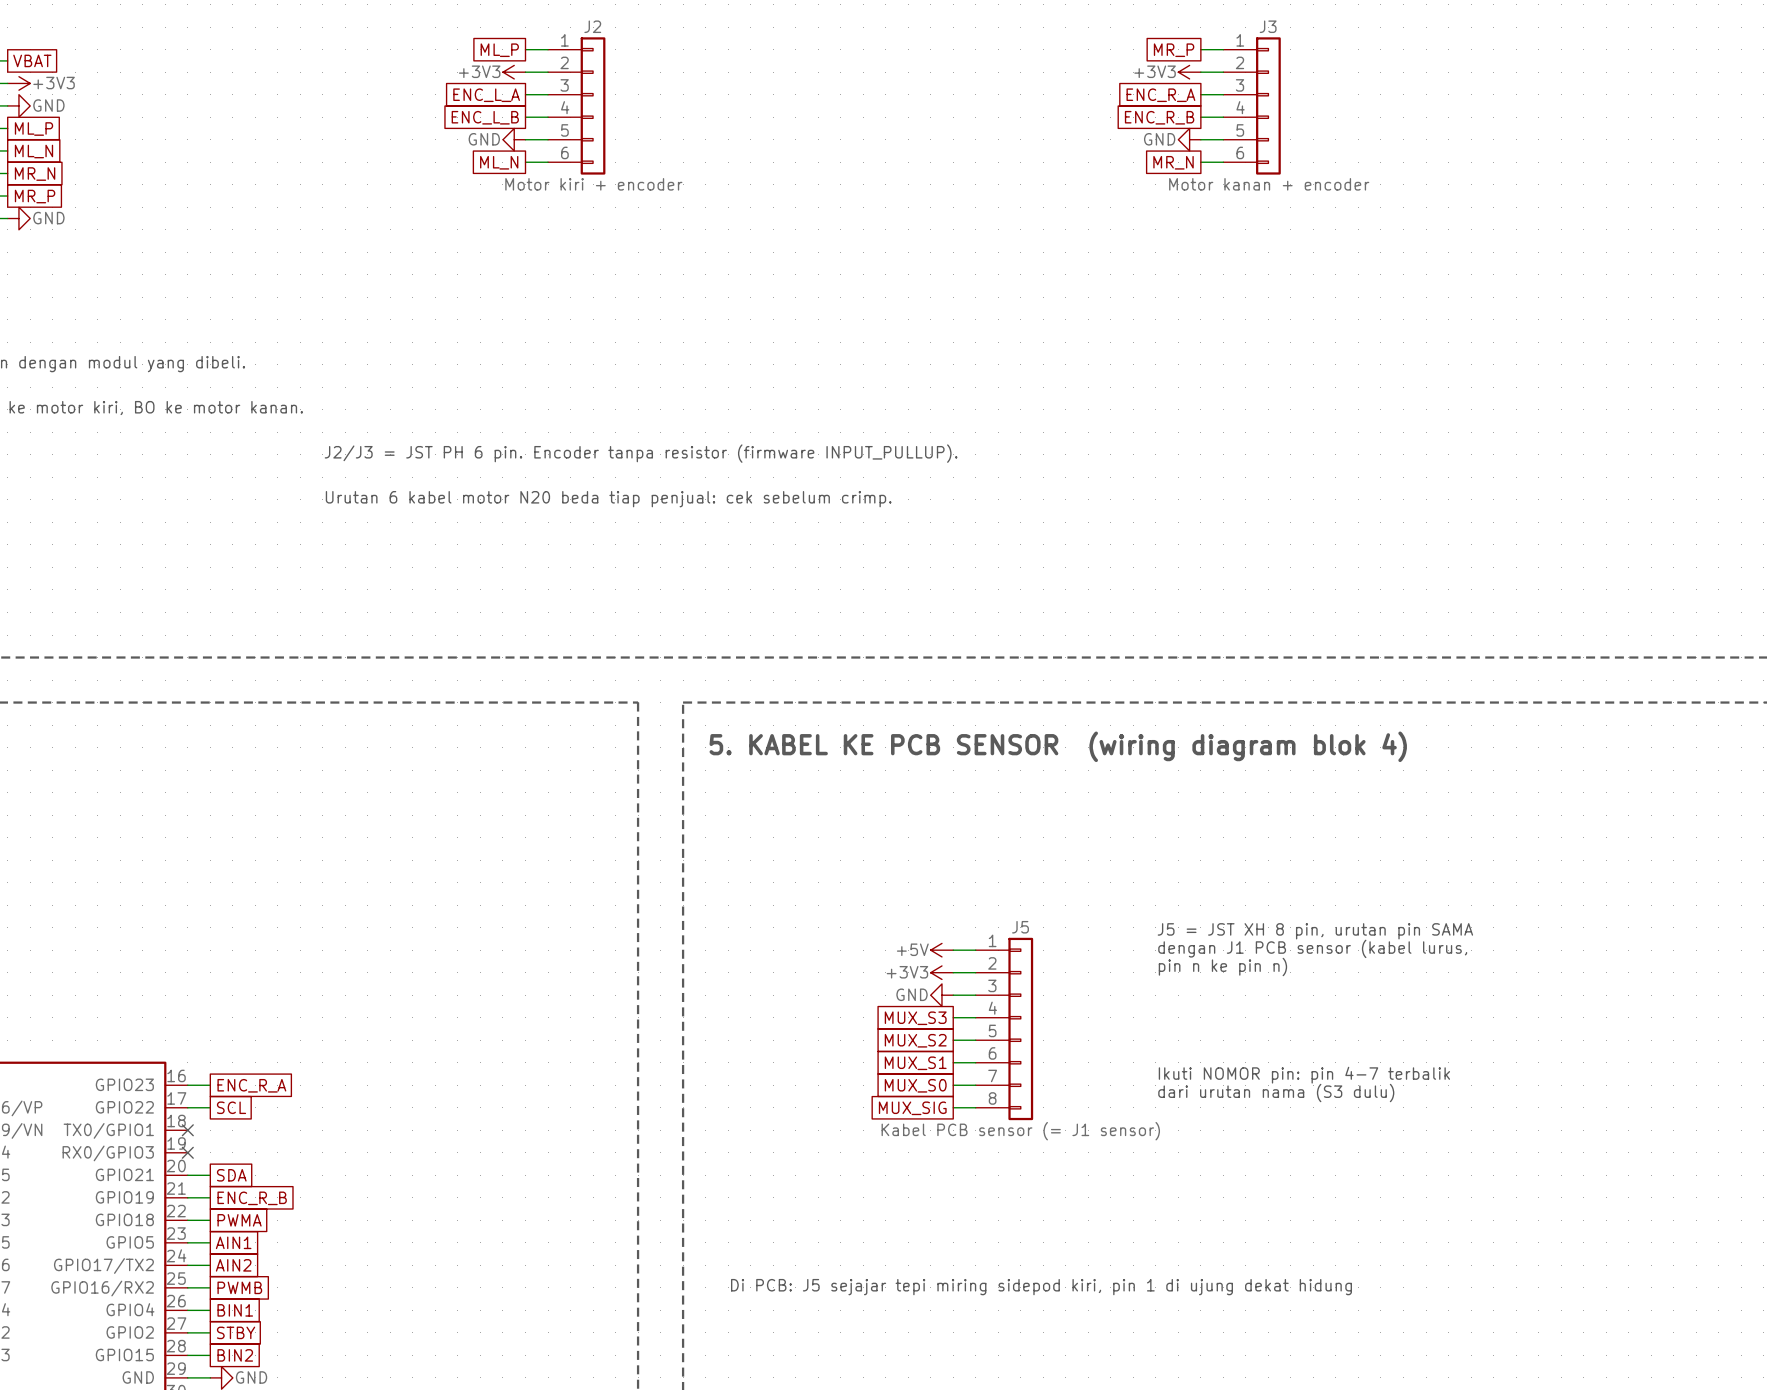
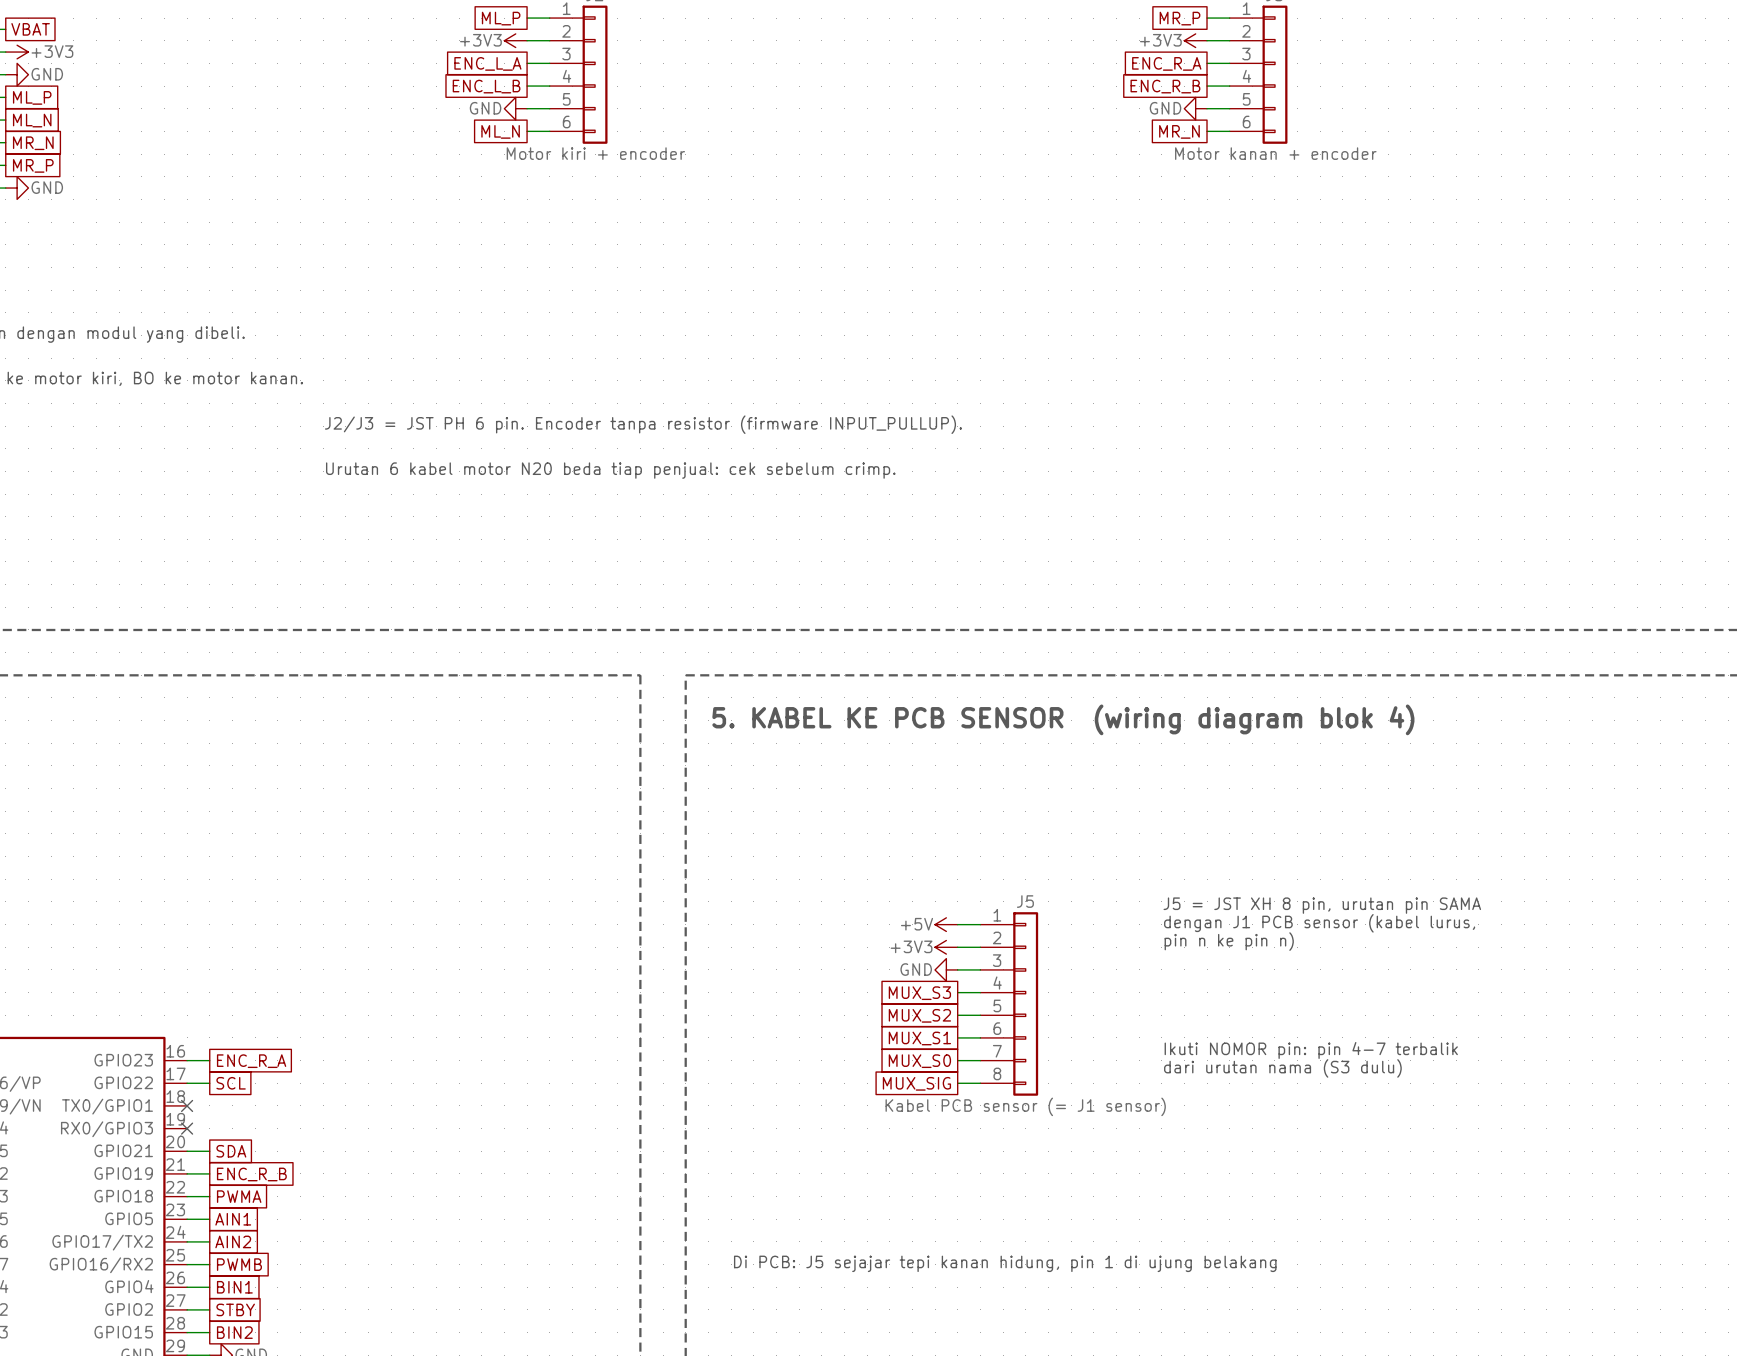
text: Di PCB: J5 sejajar tepi miring sidepod kiri, pin 1 di ujung dekat hidung (1041, 1287) -> Di PCB: J5 sejajar tepi kanan hidung, pin 1 di ujung belakang (1005, 1263)

